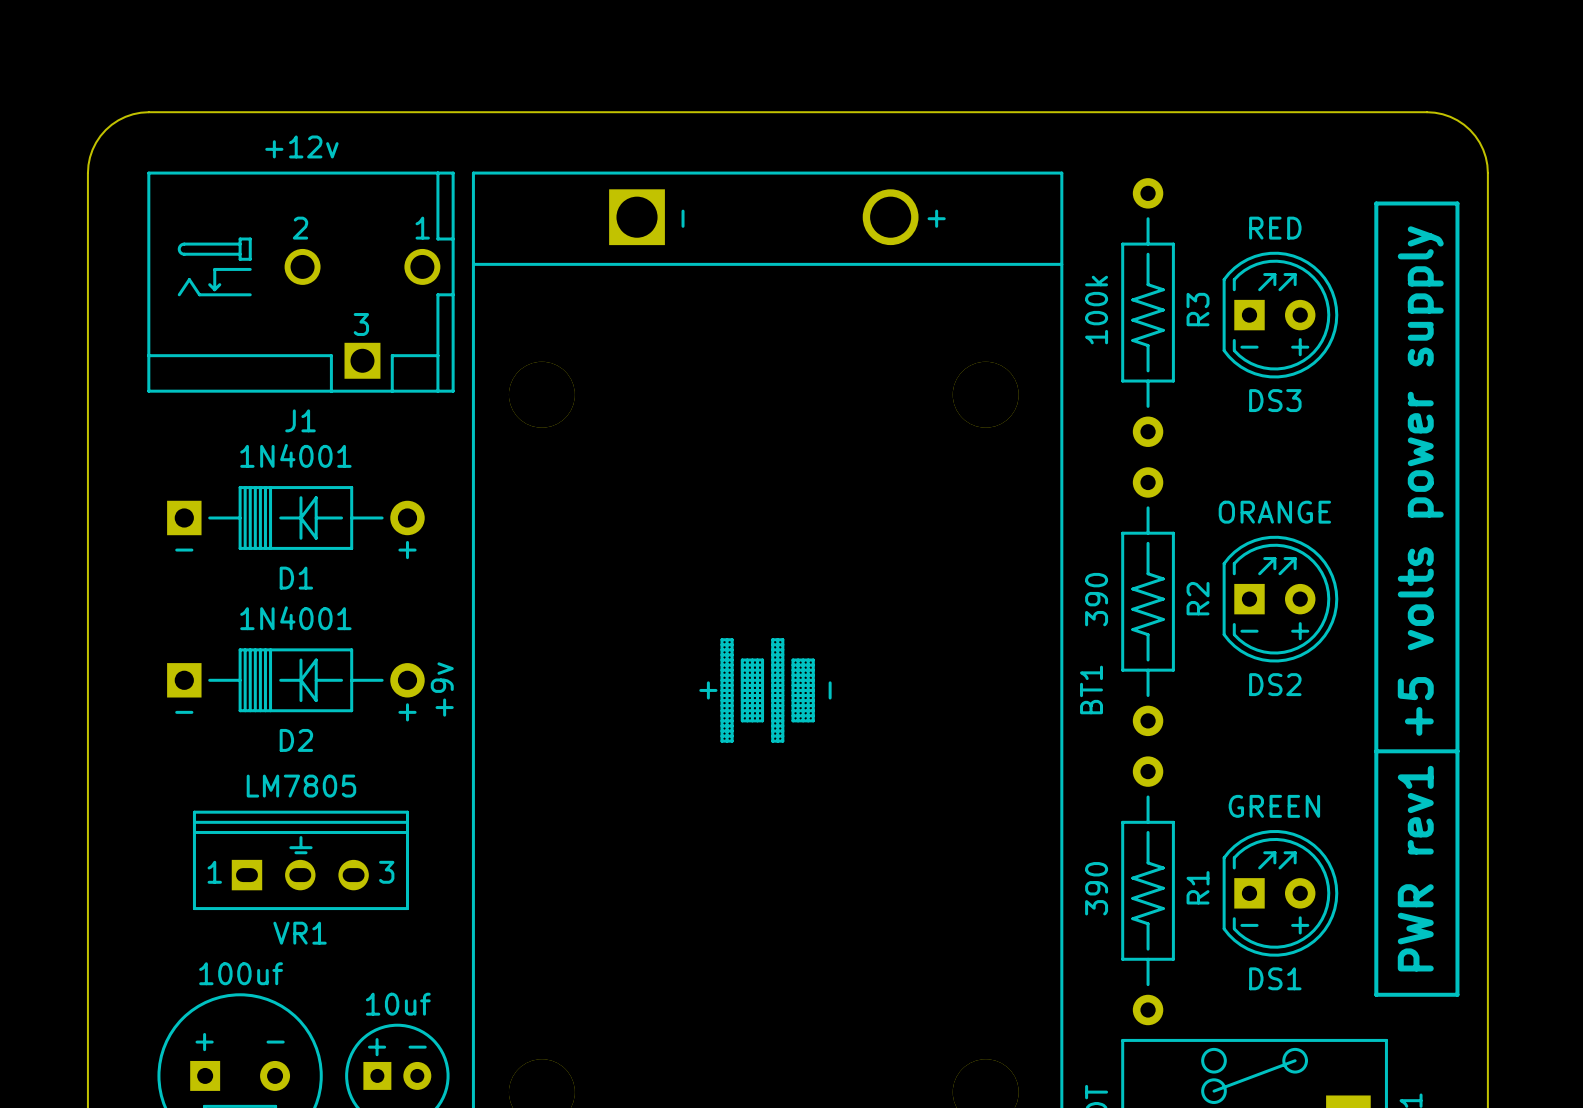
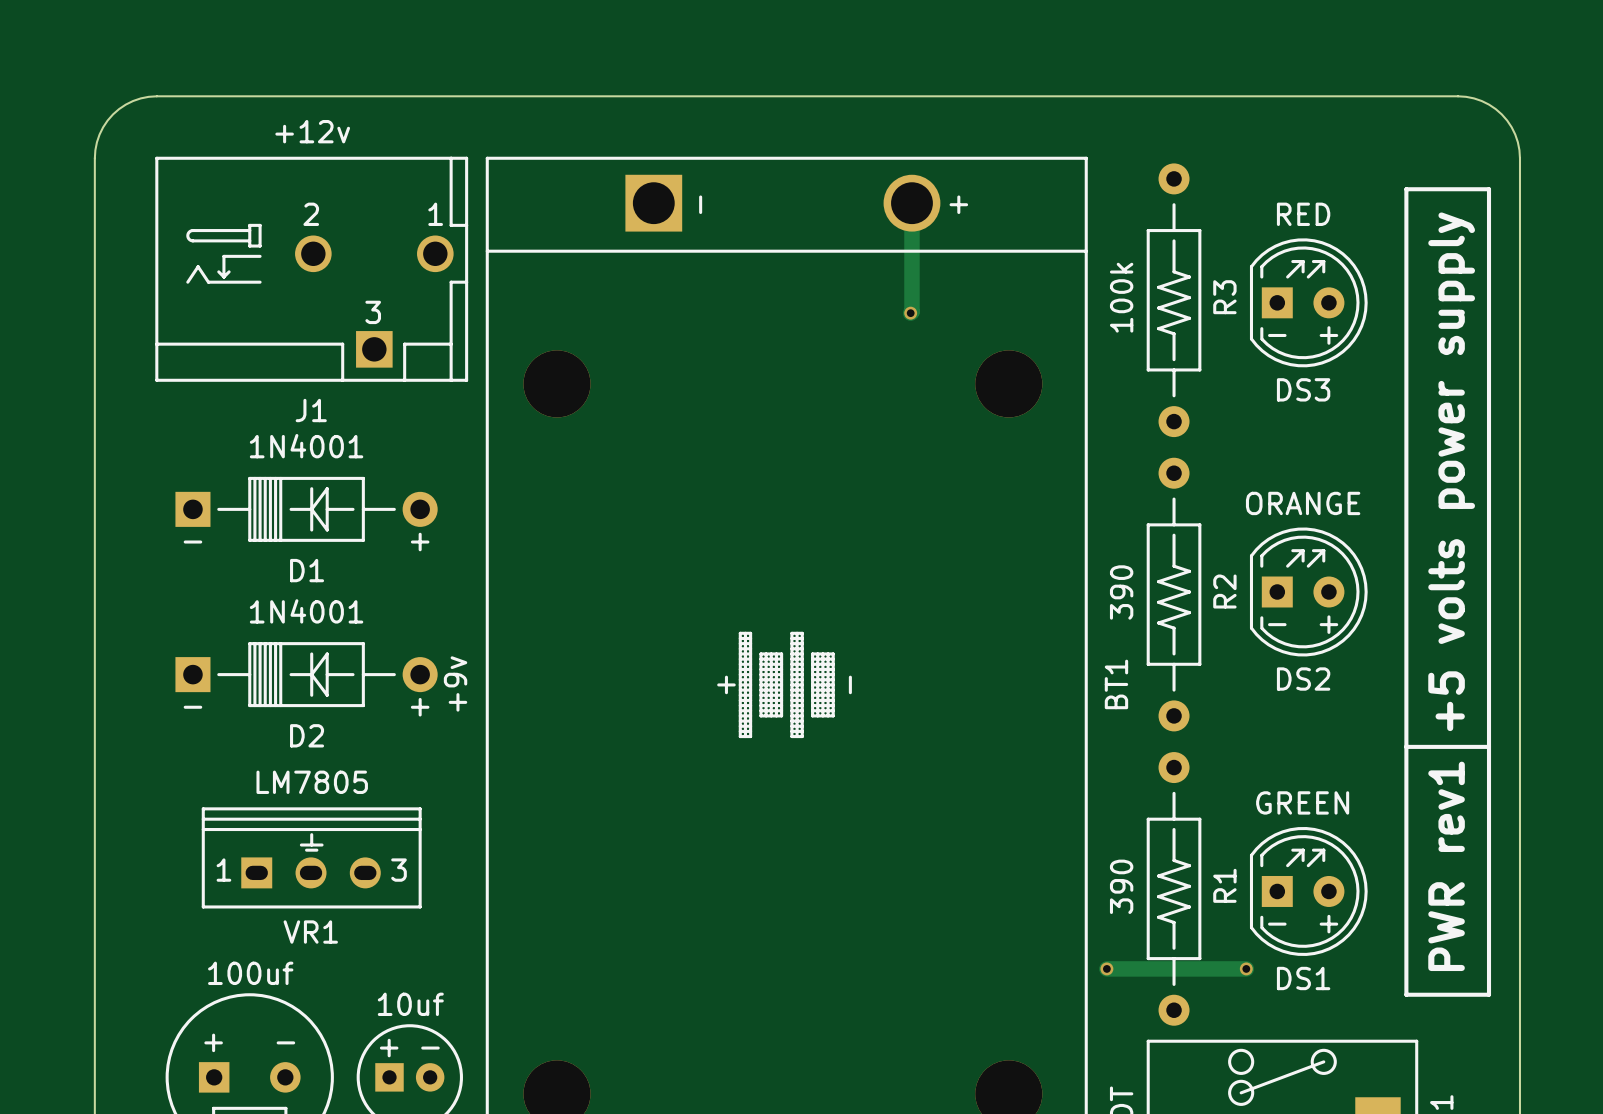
track: none -> (911, 203) (910, 313)
via: none -> (910, 313)
track: none -> (1106, 968) (1246, 968)
via: none -> (1106, 968)
via: none -> (1246, 968)

